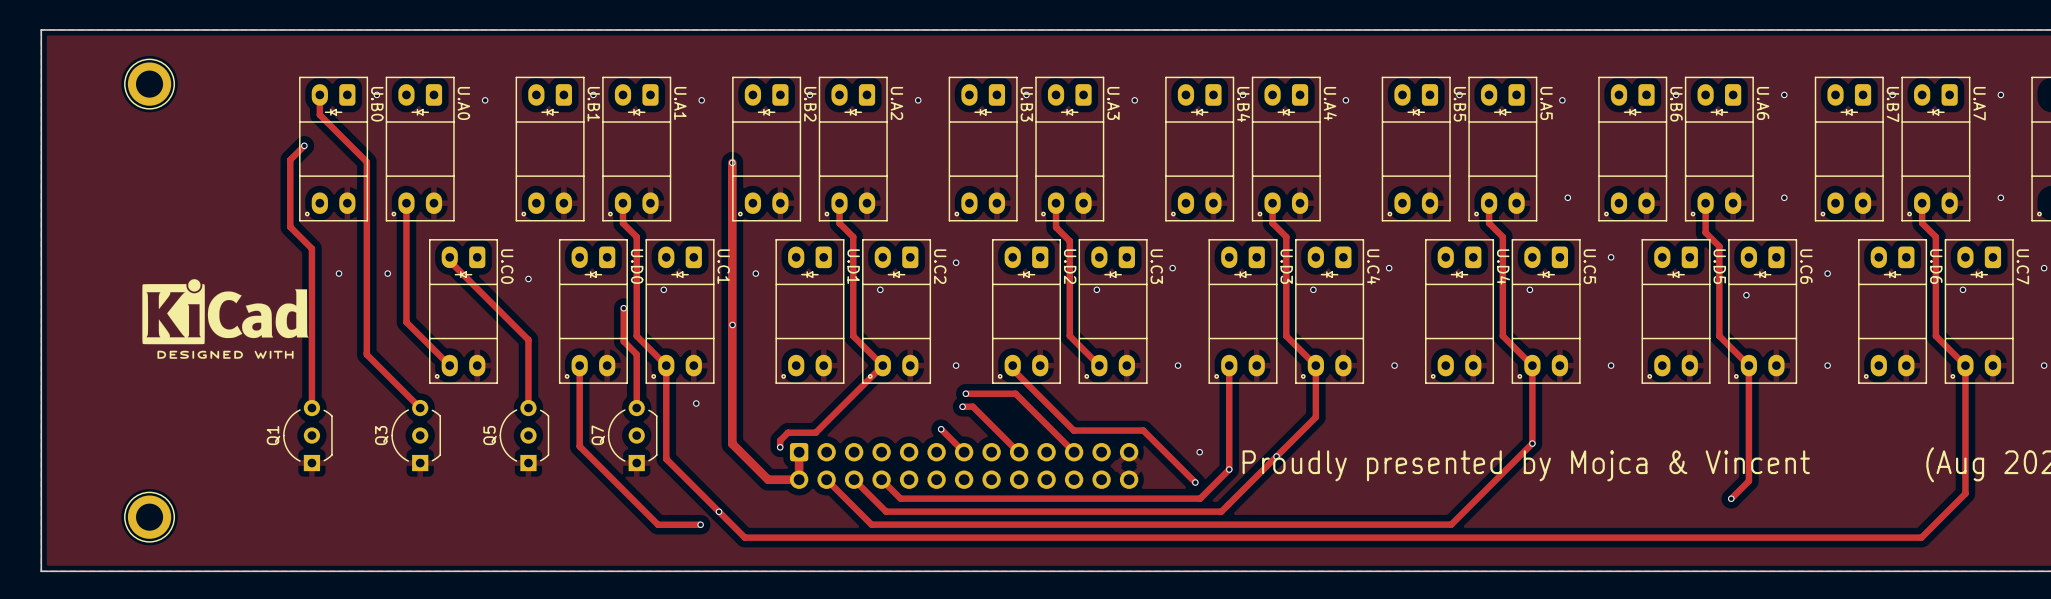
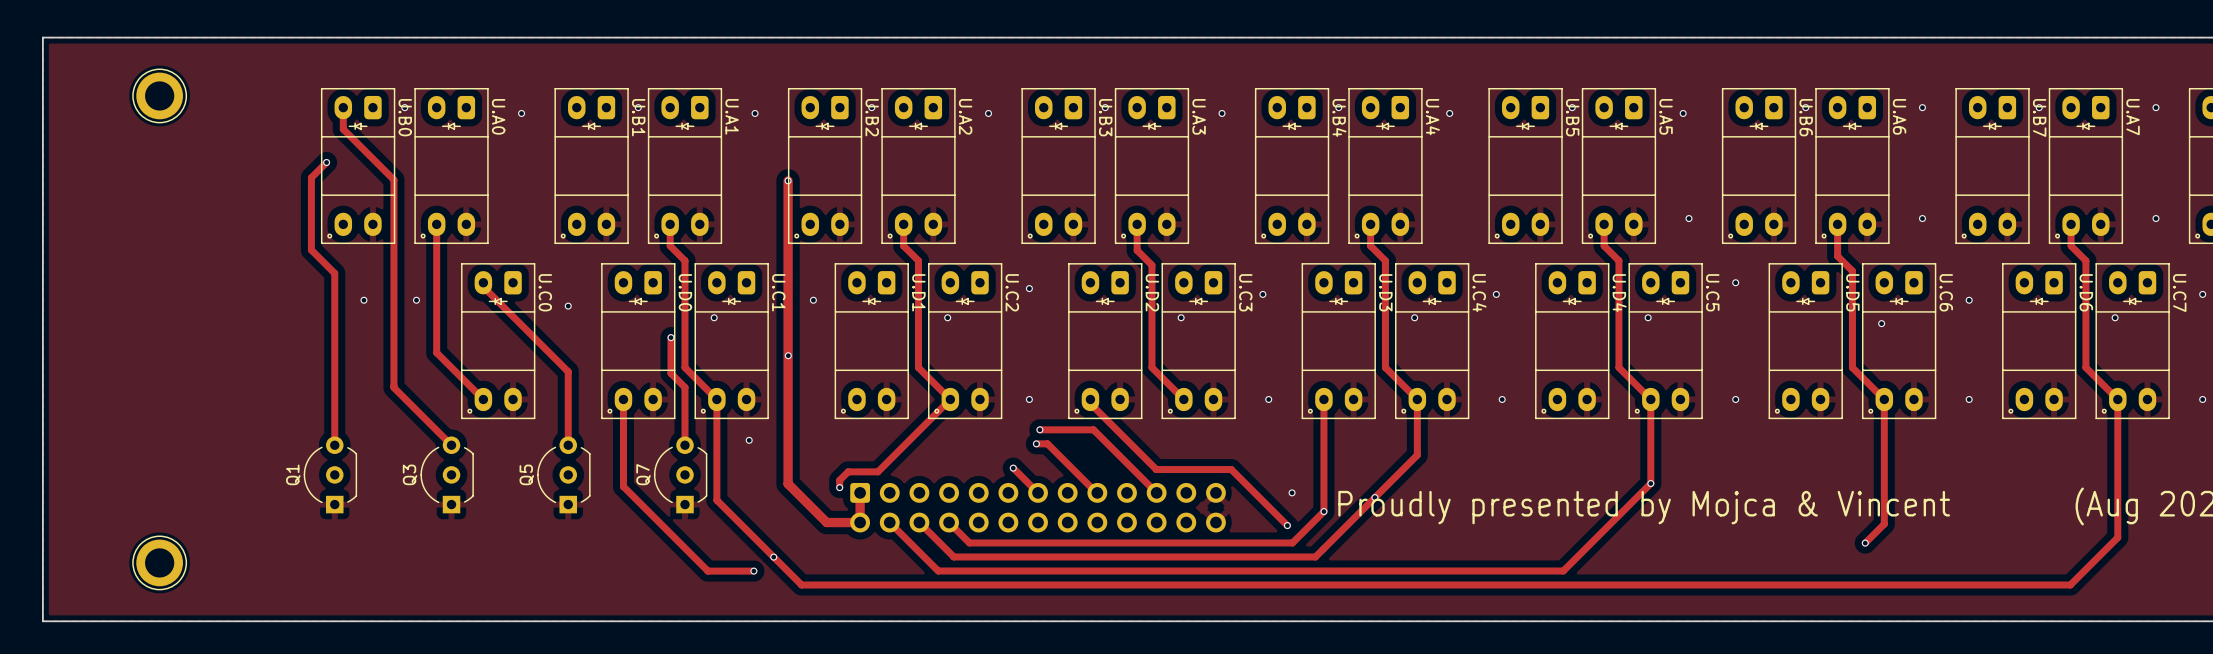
drawing: [142, 279, 309, 359] -> none

